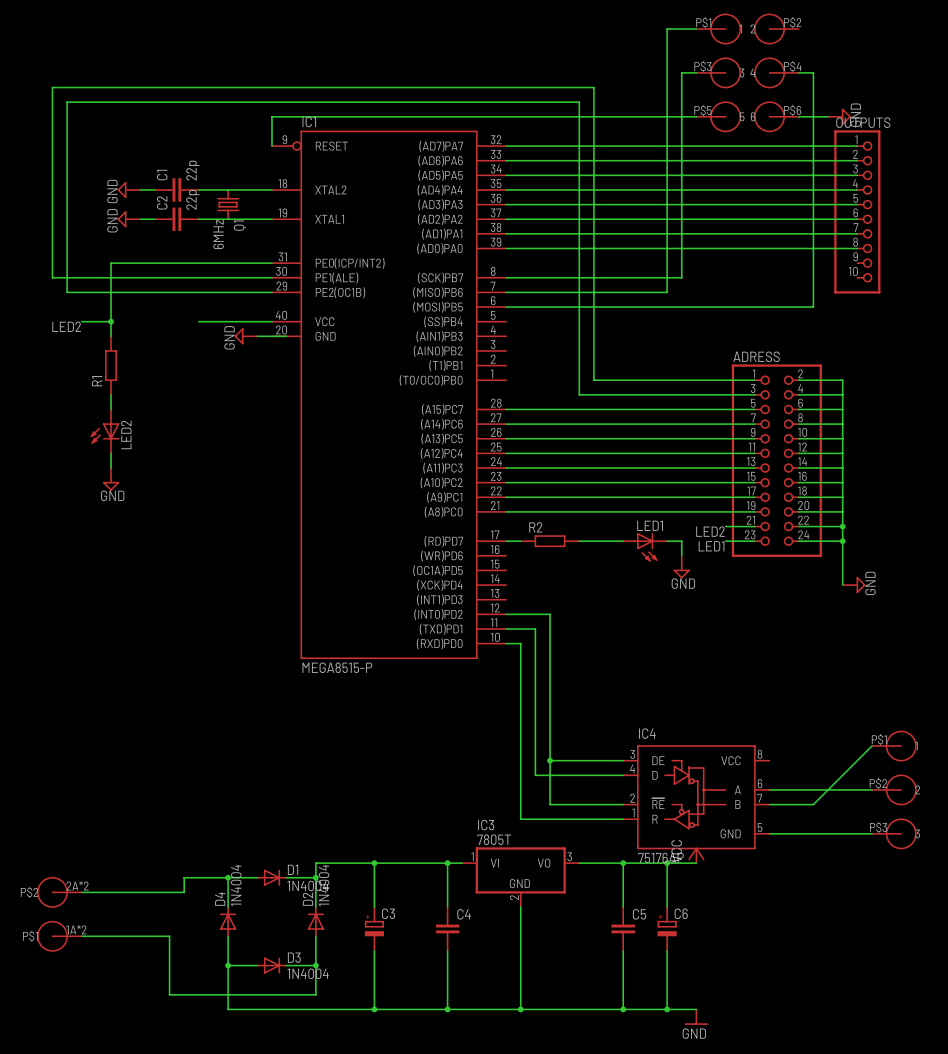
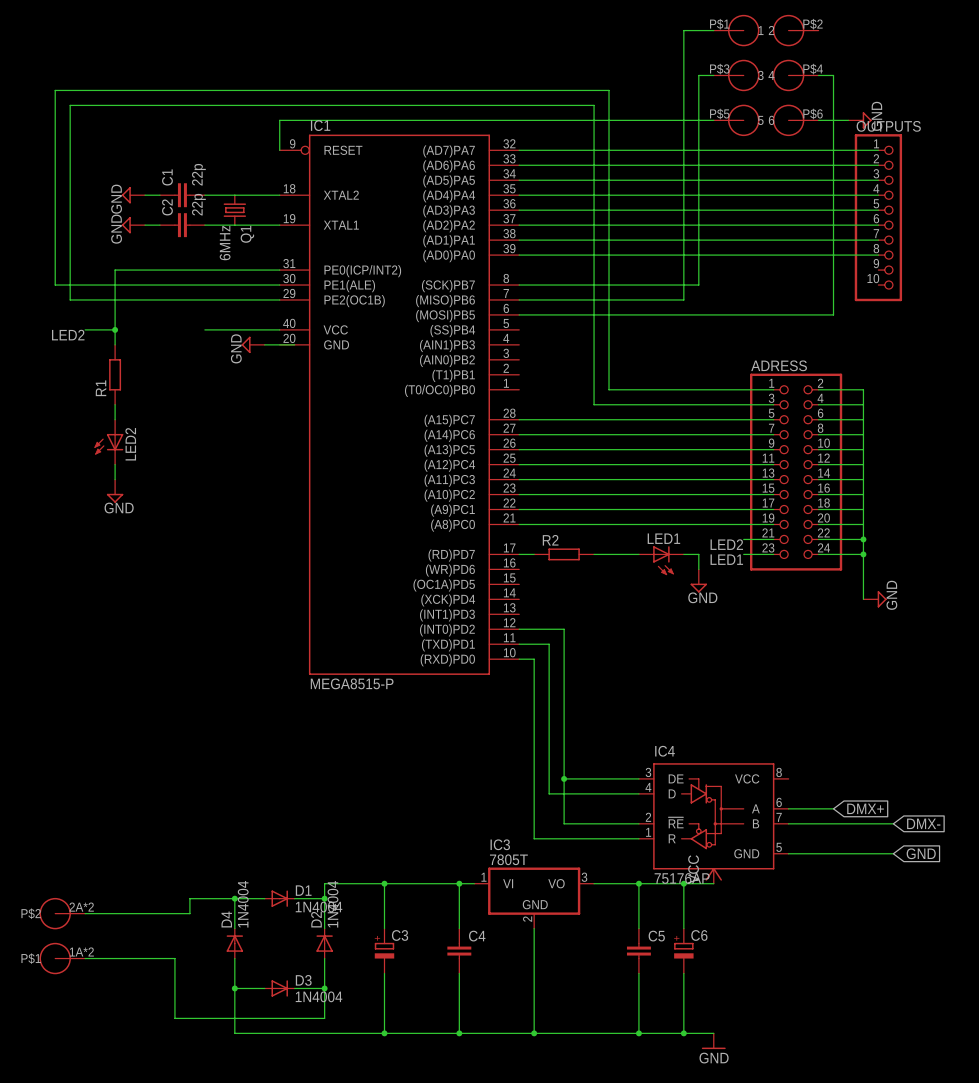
wire: (871, 746) (813, 804) -> (893, 823) (833, 823)
wire: (813, 789) (871, 789) -> none
global label: none -> DMX+ (865, 808)
part: (894, 789) -> none
global label: none -> DMX- (923, 823)
global label: none -> GND (921, 853)

